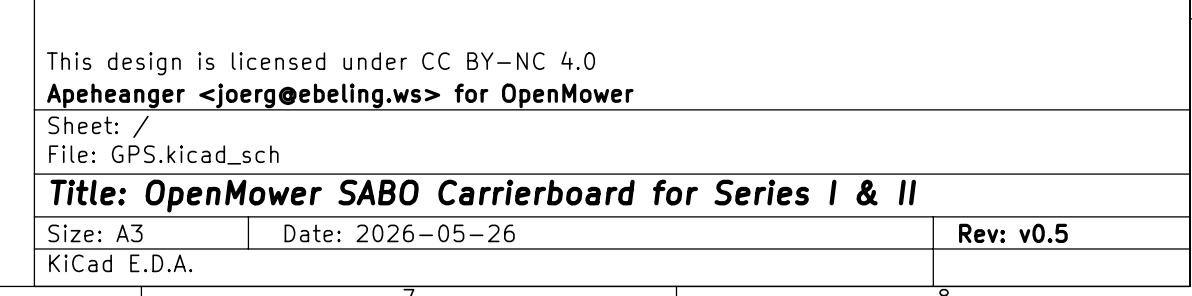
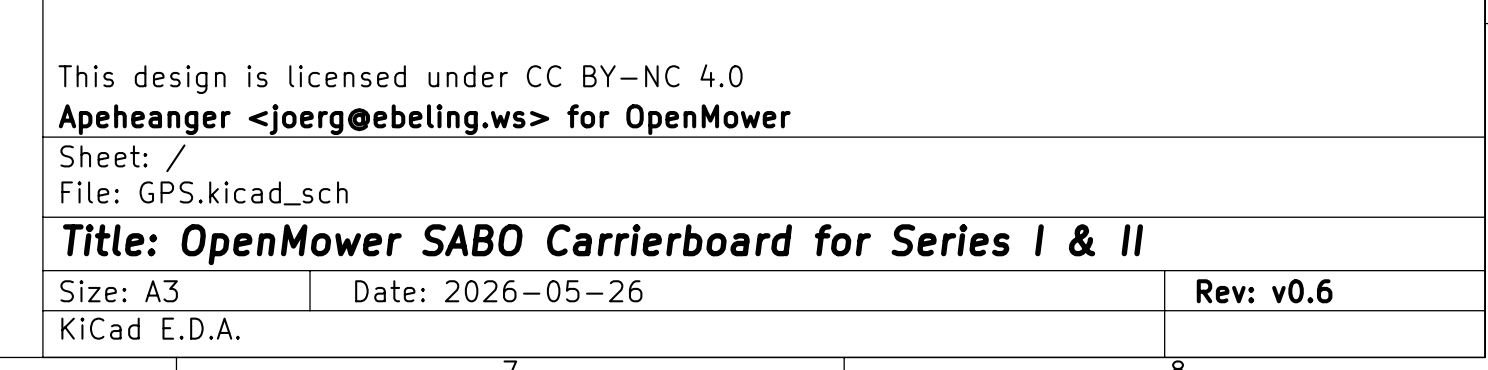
title block: Rev: v0.5 (1013, 233) -> Rev: v0.6 (1264, 291)

